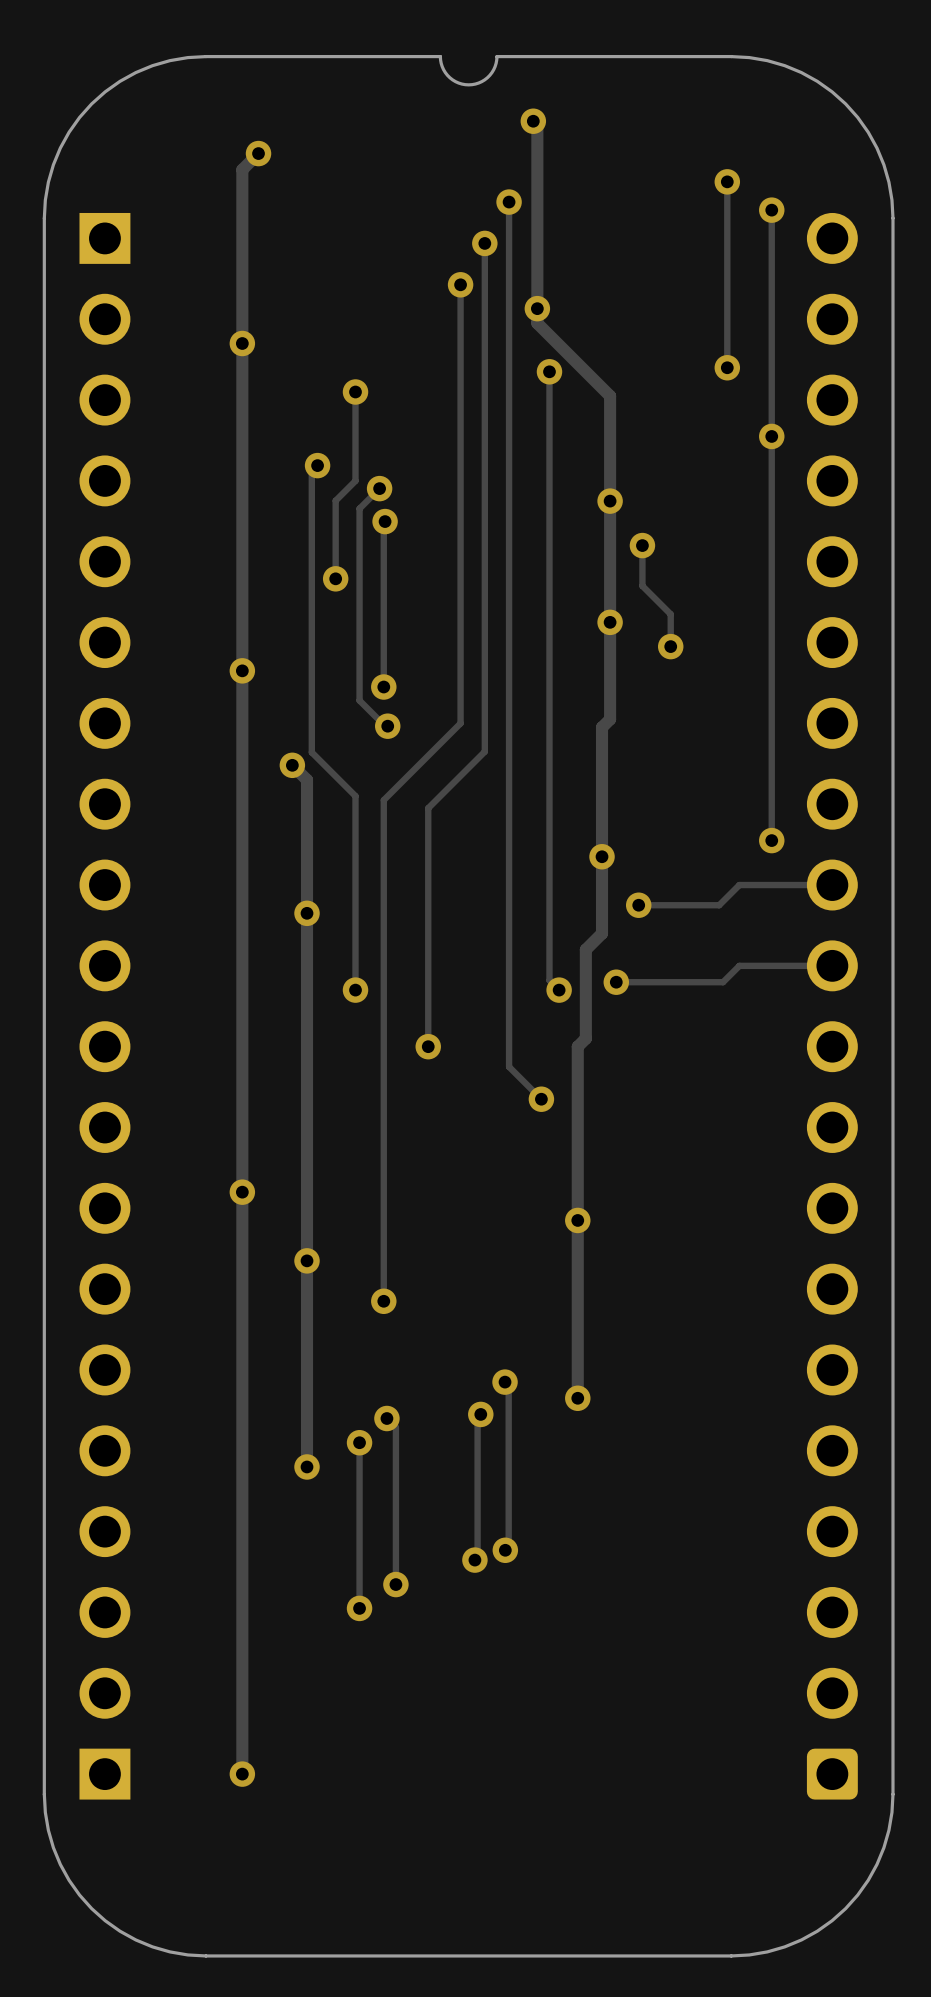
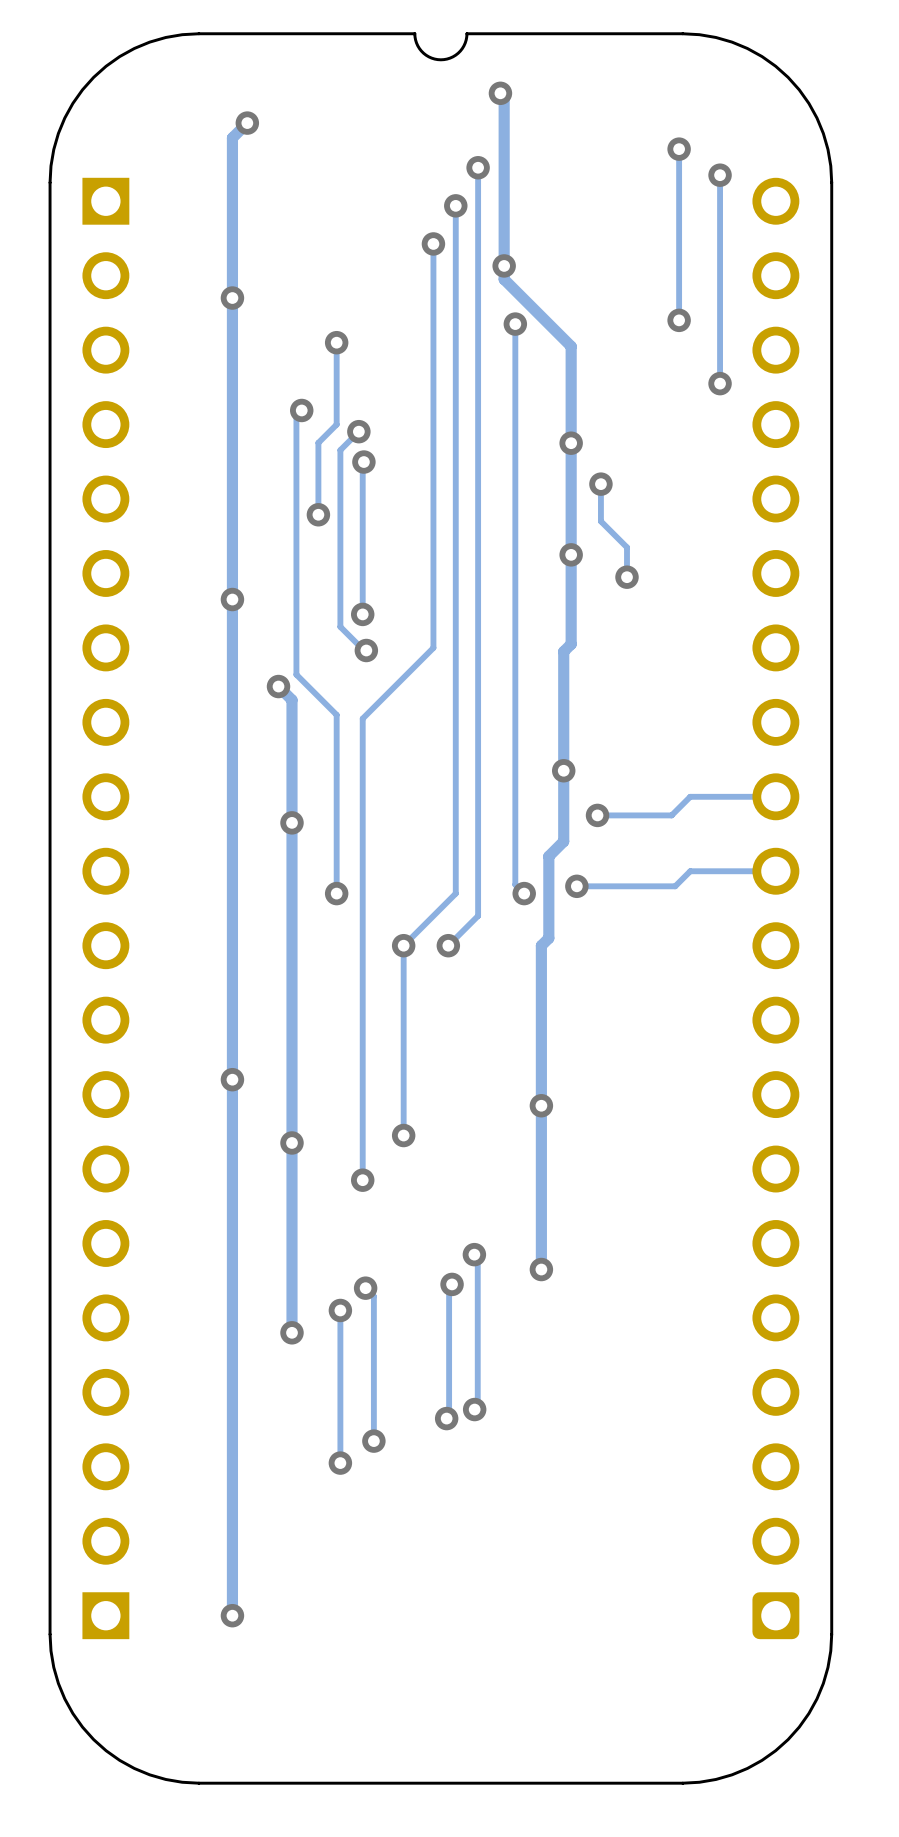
track: (771, 436) (771, 840) -> none
track: (484, 751) (428, 808) (428, 1046) -> (455, 673) (455, 893) (403, 945) (403, 1135)
via: (771, 840) -> none
track: (509, 1014) (509, 1066) (541, 1099) -> (478, 915) (448, 945)
via position: (541, 1099) -> (448, 945)
via: none -> (403, 1135)

